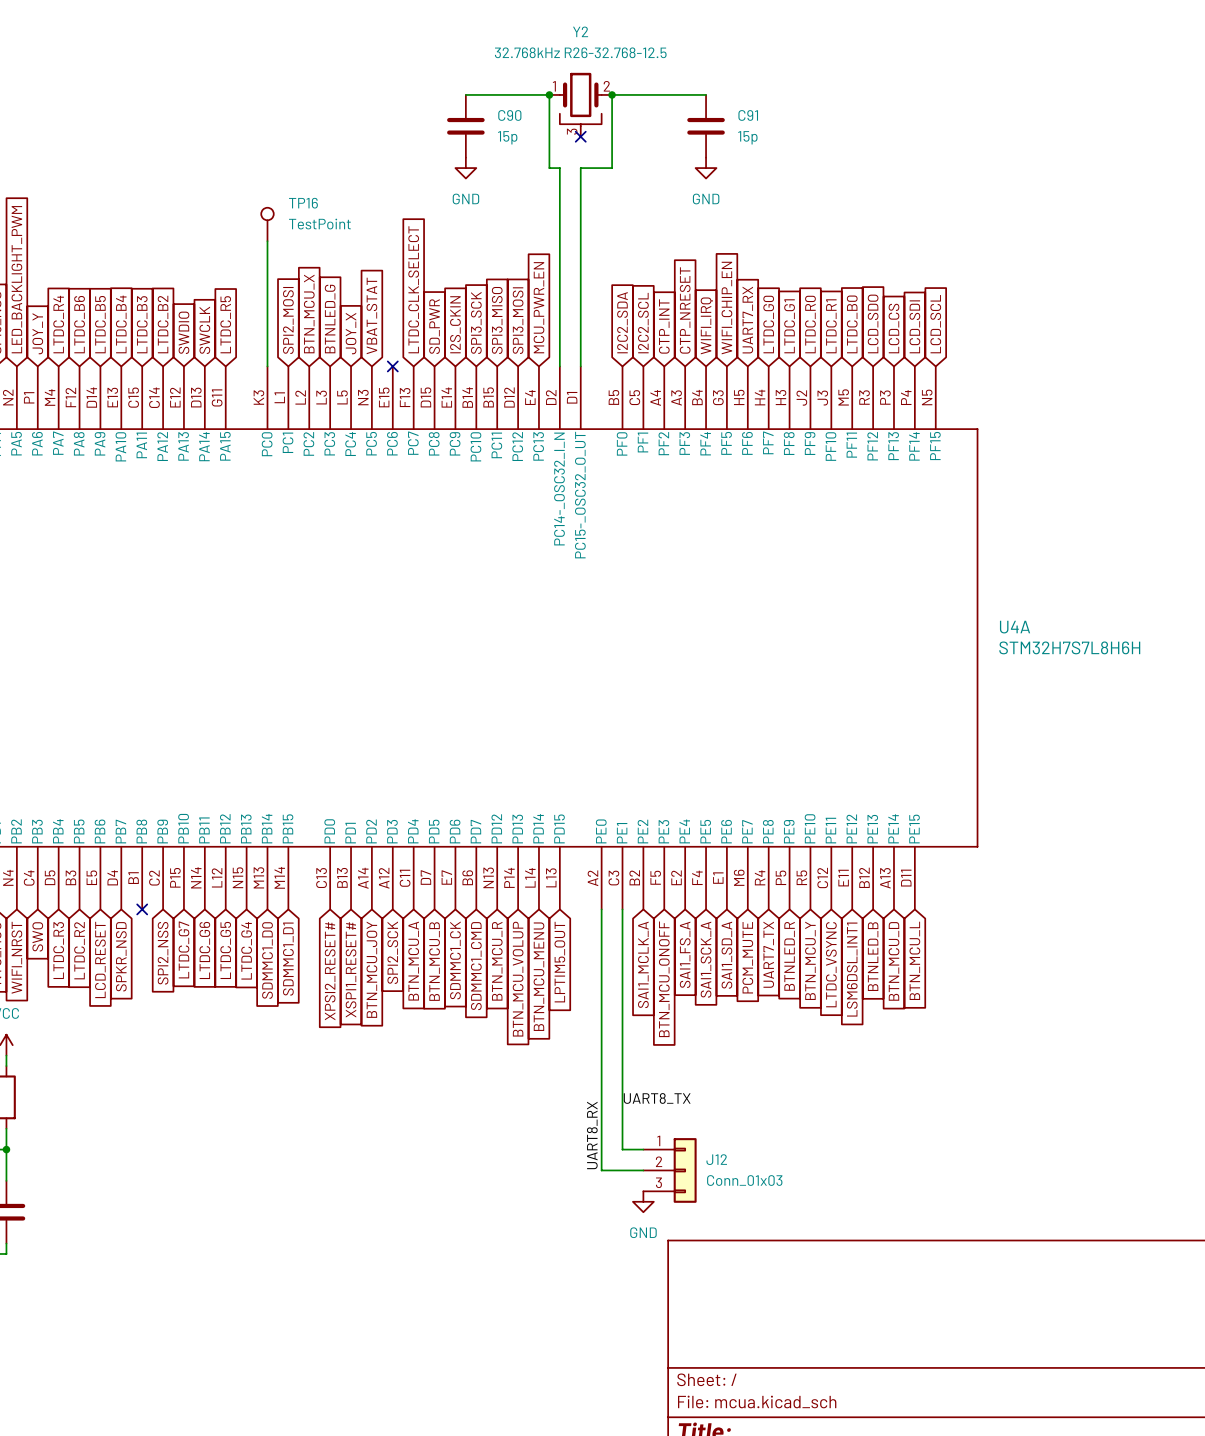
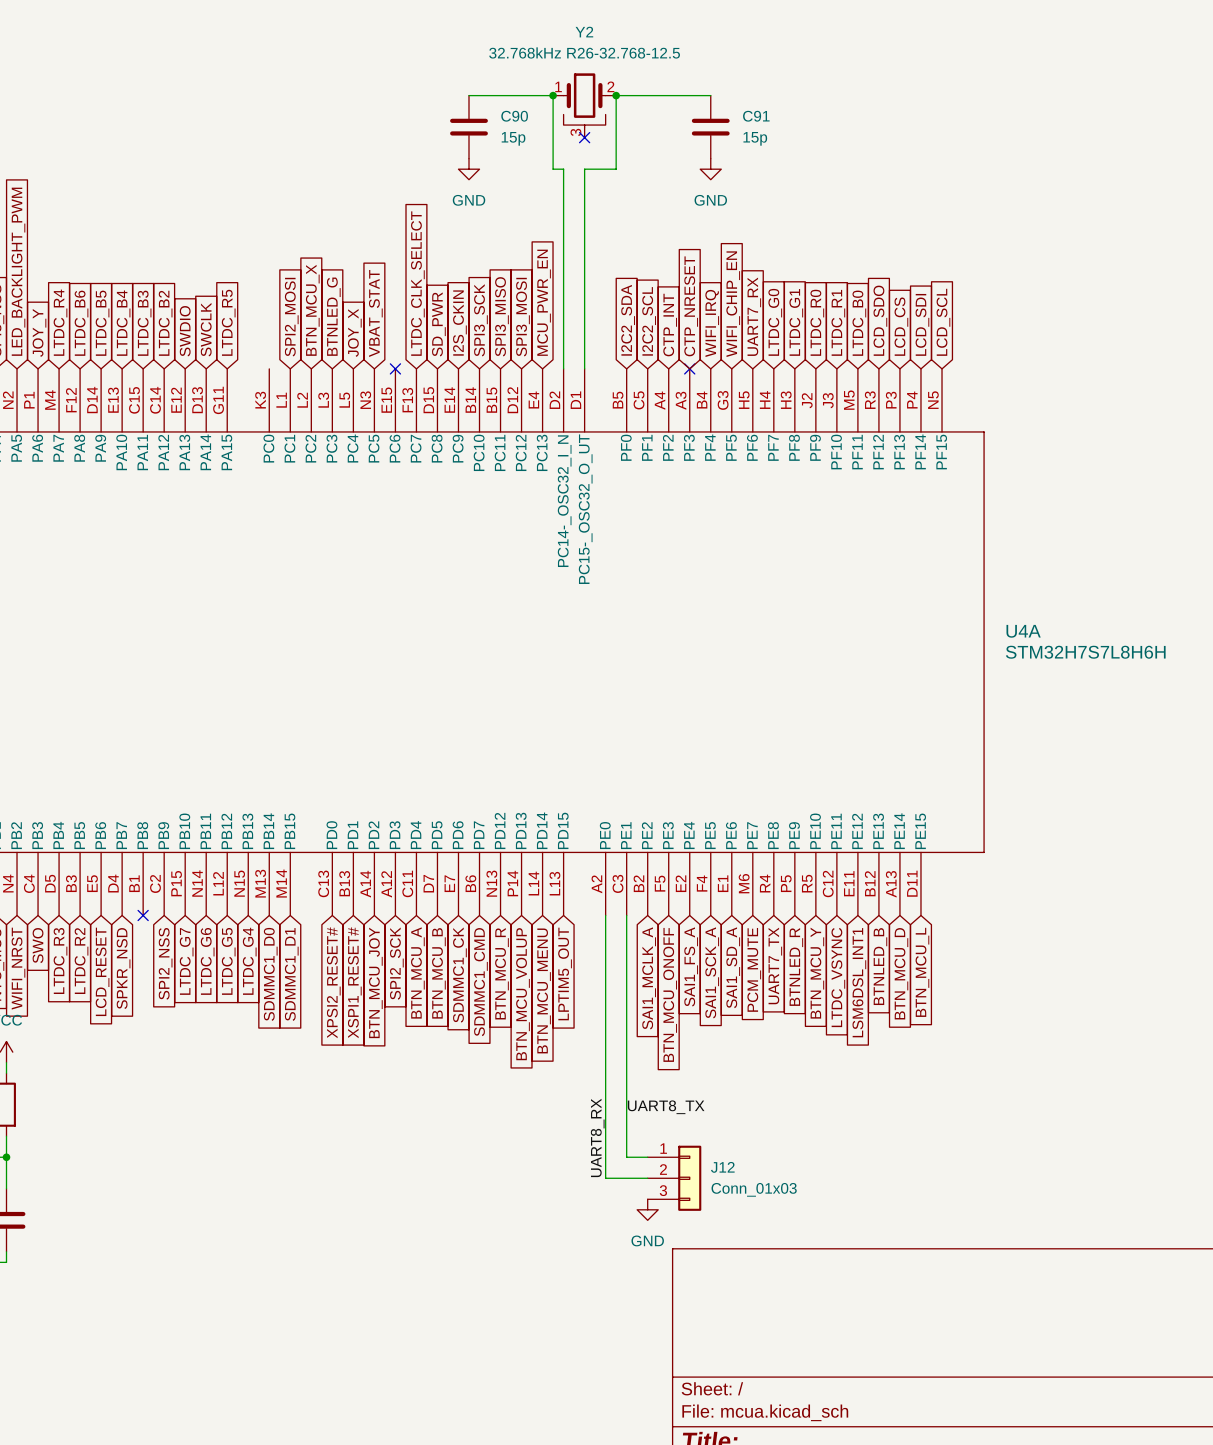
TP16: TestPoint (267, 224) -> none
wire: (267, 241) (267, 366) -> none
no-connect mark: none -> (689, 368)

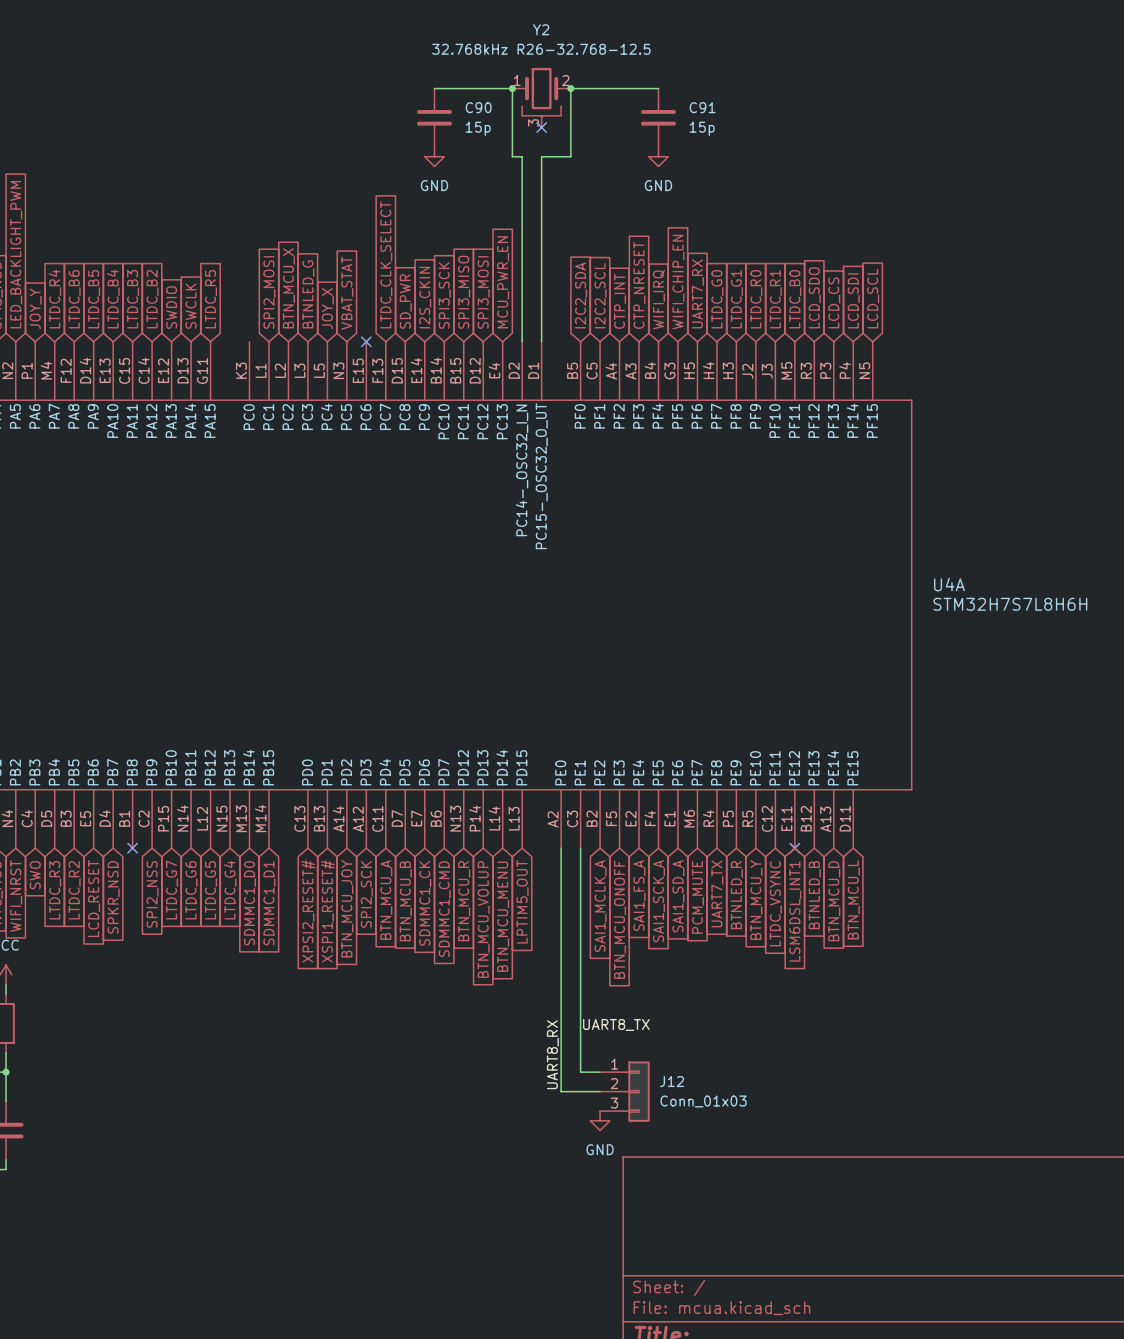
no-connect mark: (689, 368) -> none
no-connect mark: none -> (794, 848)

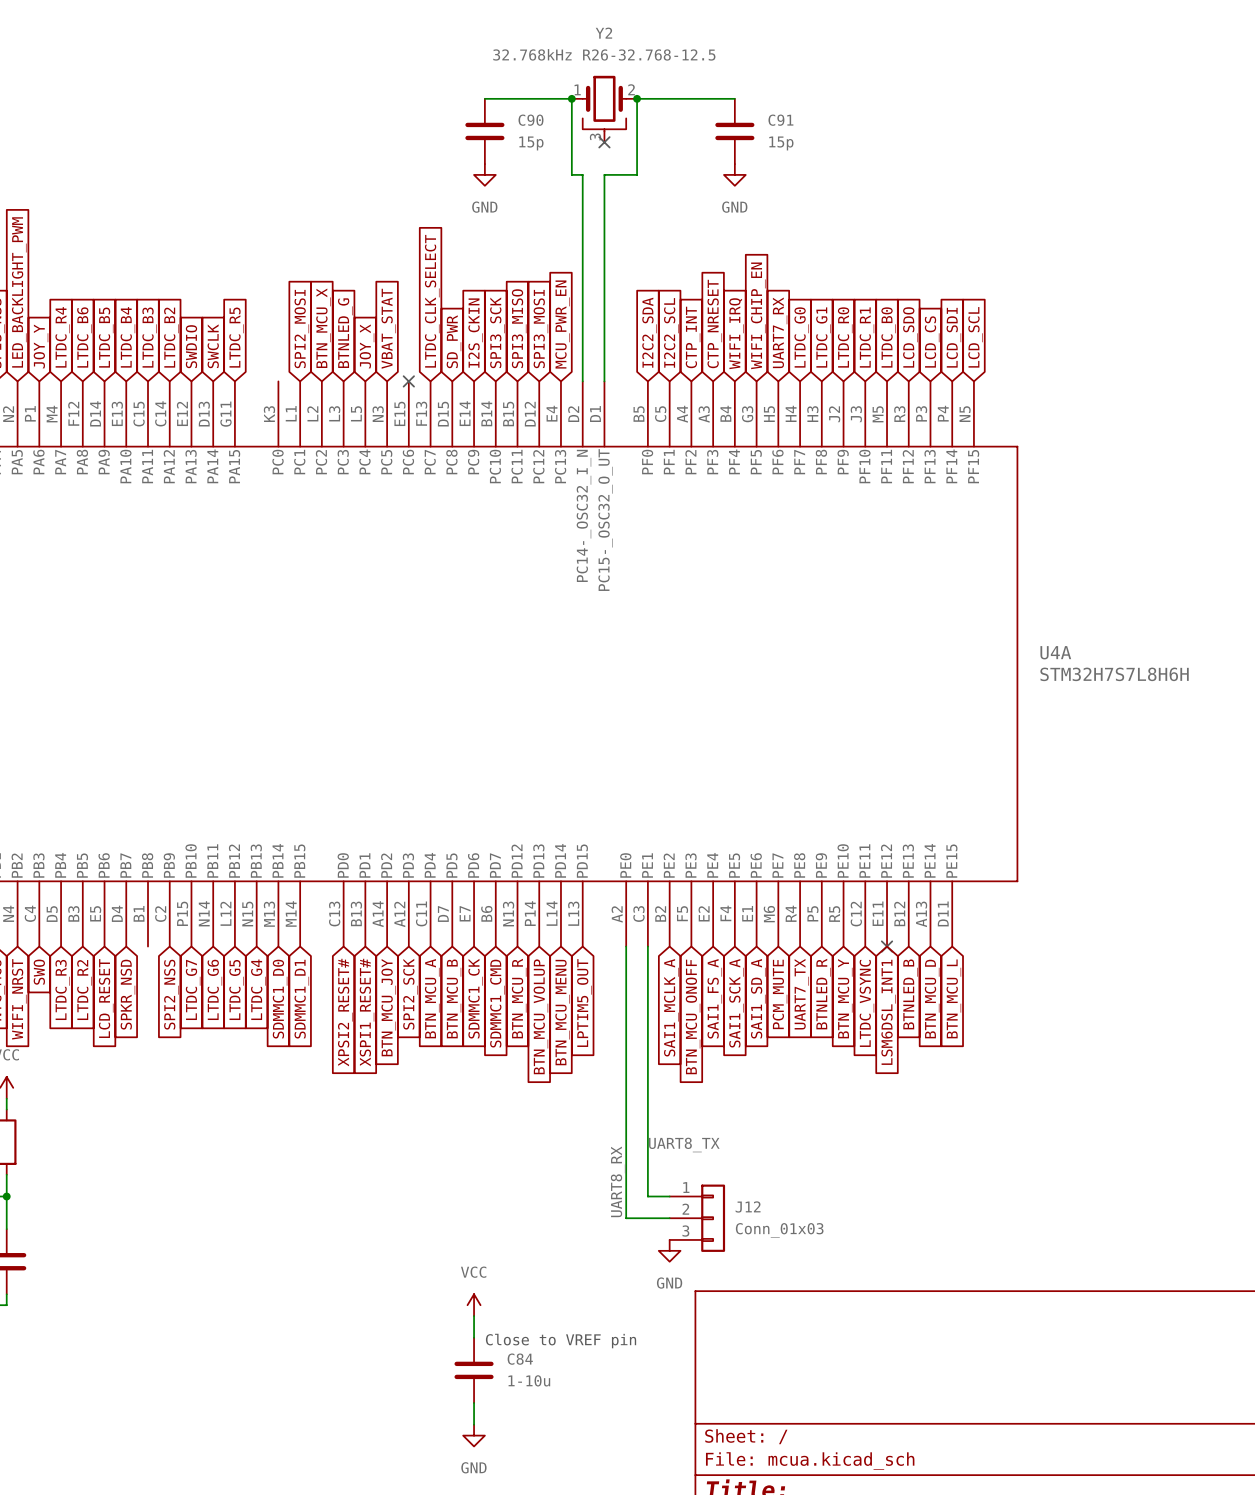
no-connect mark: (132, 848) -> none
power symbol: none -> VCC (474, 1305)
wire: none -> (474, 1316) (474, 1337)
text: none -> Close to VREF pin (561, 1341)
C84: none -> 1-10u (474, 1370)
wire: none -> (474, 1402) (474, 1424)
power symbol: none -> GND (474, 1435)

